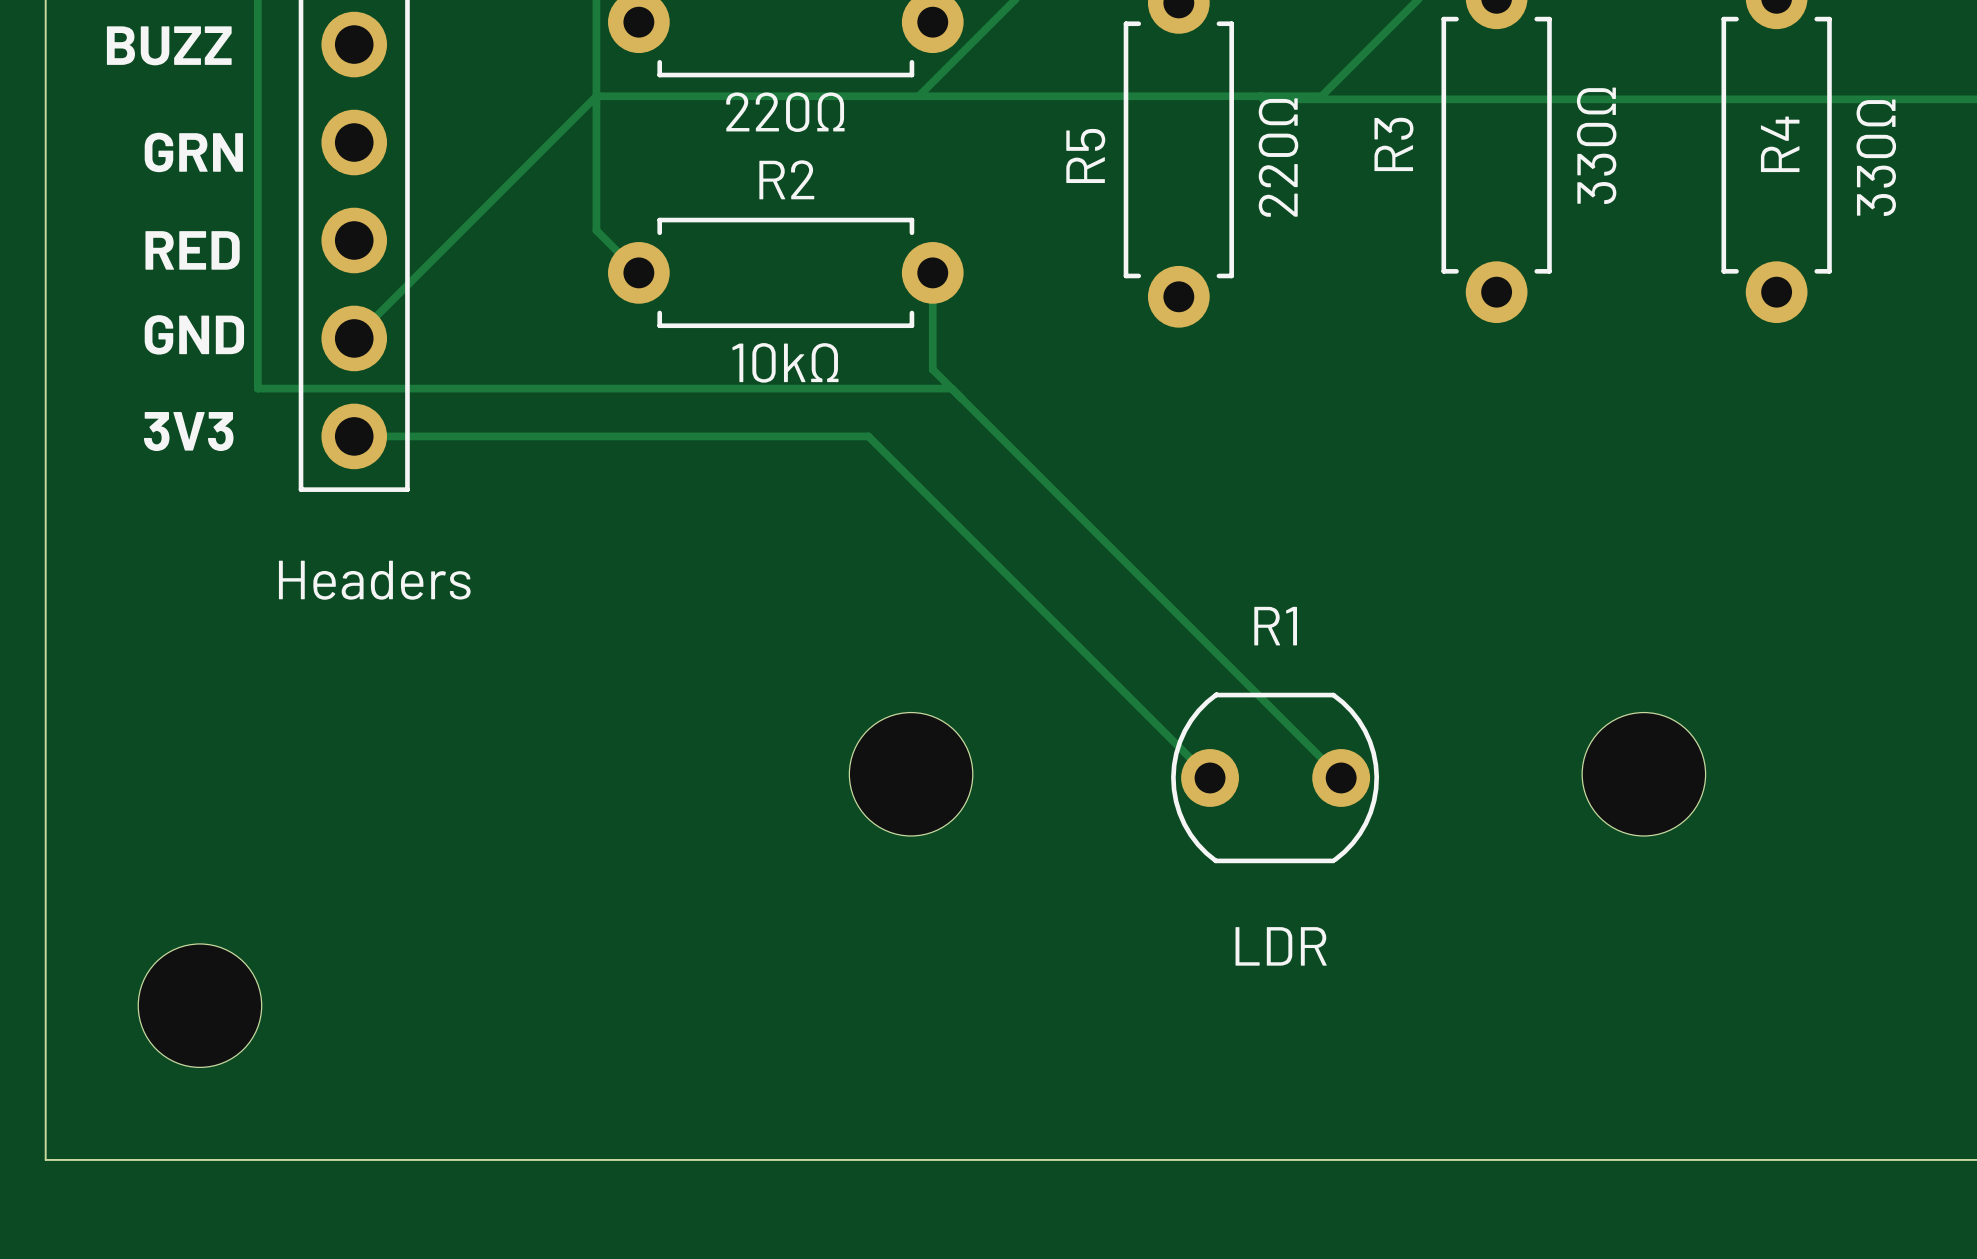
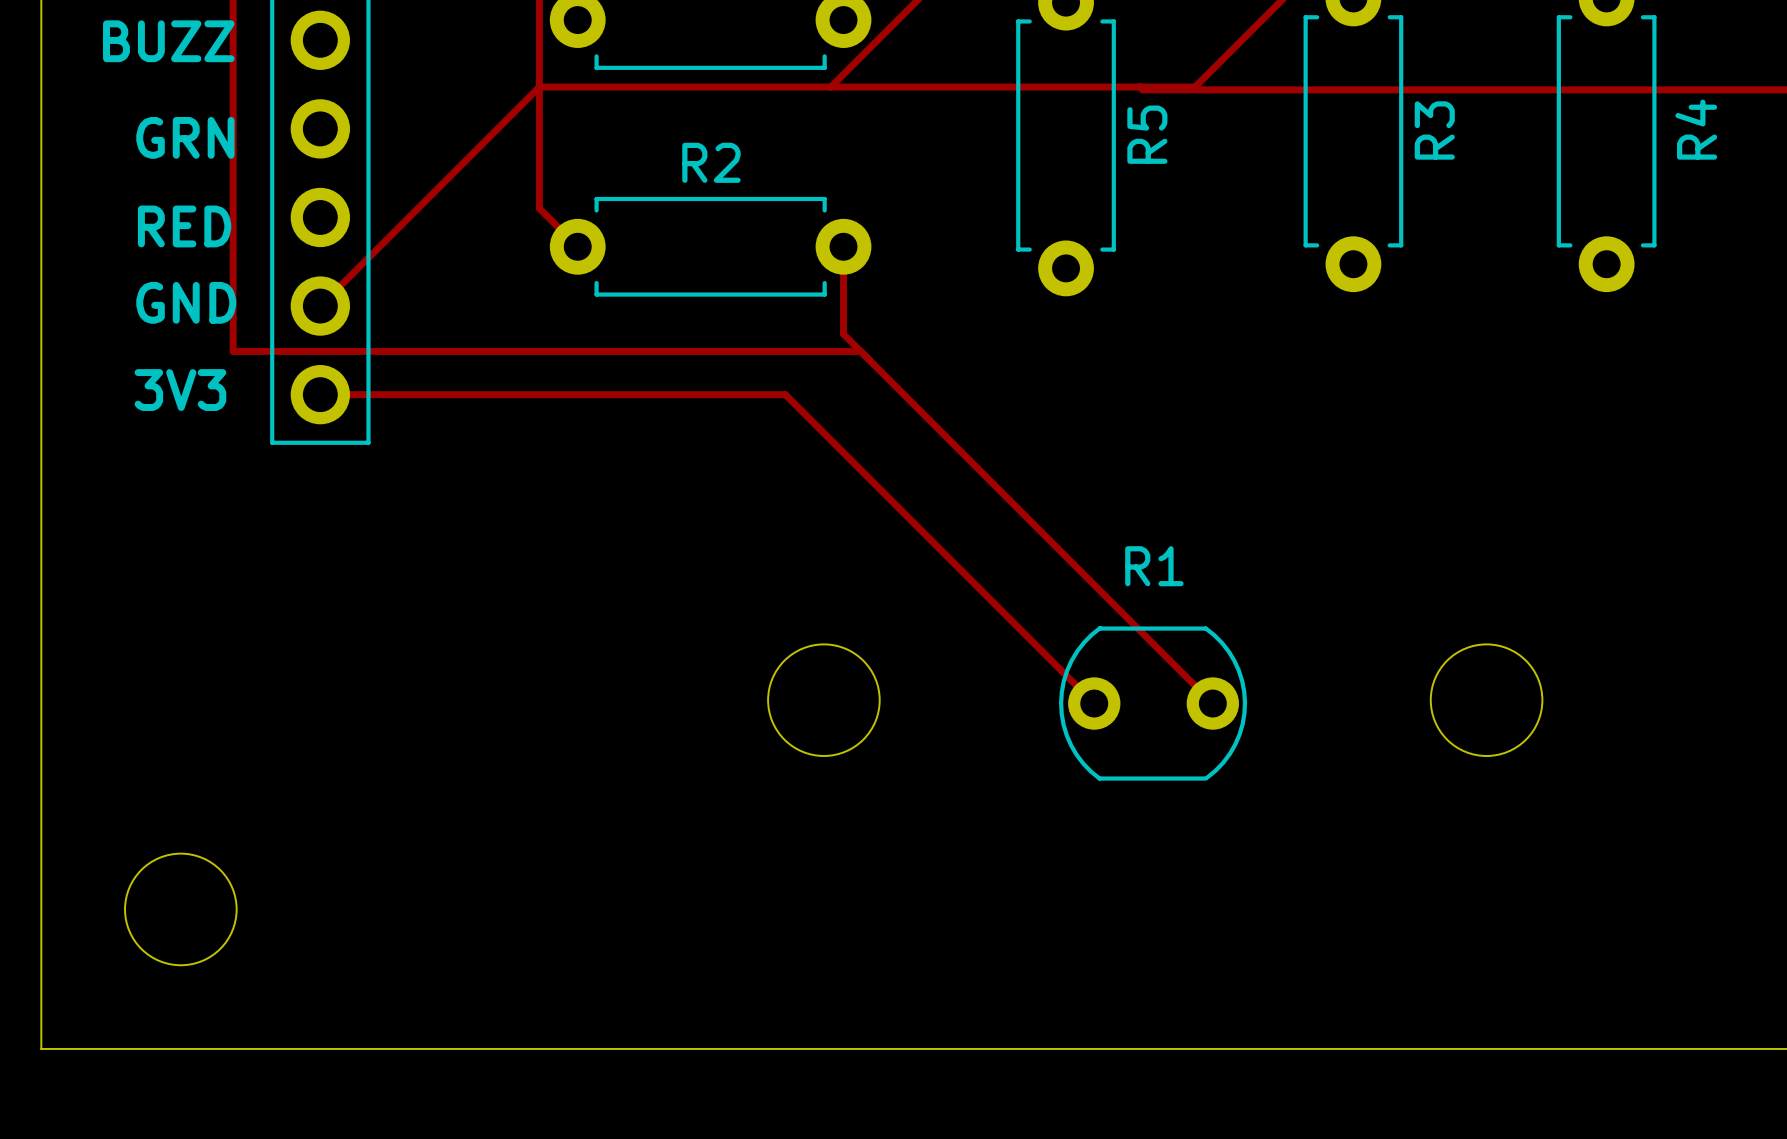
part value: 220Ω (785, 112) -> none
R3 name position: R3 (1393, 144) -> R3 (1434, 130)
R4 name position: R4 (1780, 144) -> R4 (1696, 129)
R3 value: 330Ω (1596, 145) -> none
R5 name position: R5 (1085, 155) -> R5 (1147, 134)
R5 value: 220Ω (1278, 157) -> none
R4 value: 330Ω (1876, 157) -> none
R2 value: 10kΩ (785, 362) -> none
part value: Headers (374, 580) -> none
R1 value: LDR (1281, 946) -> none

